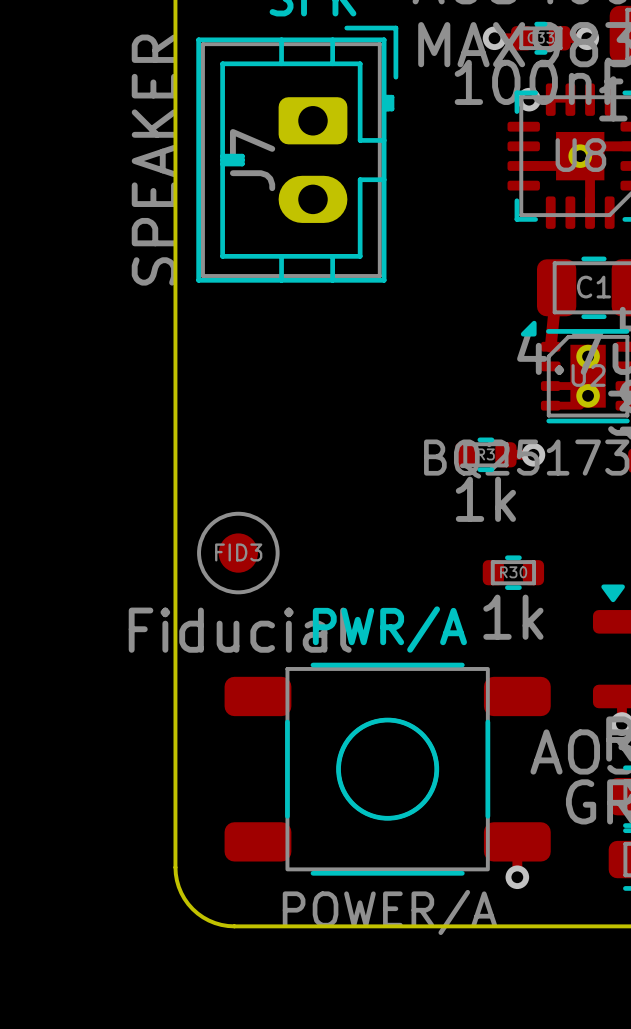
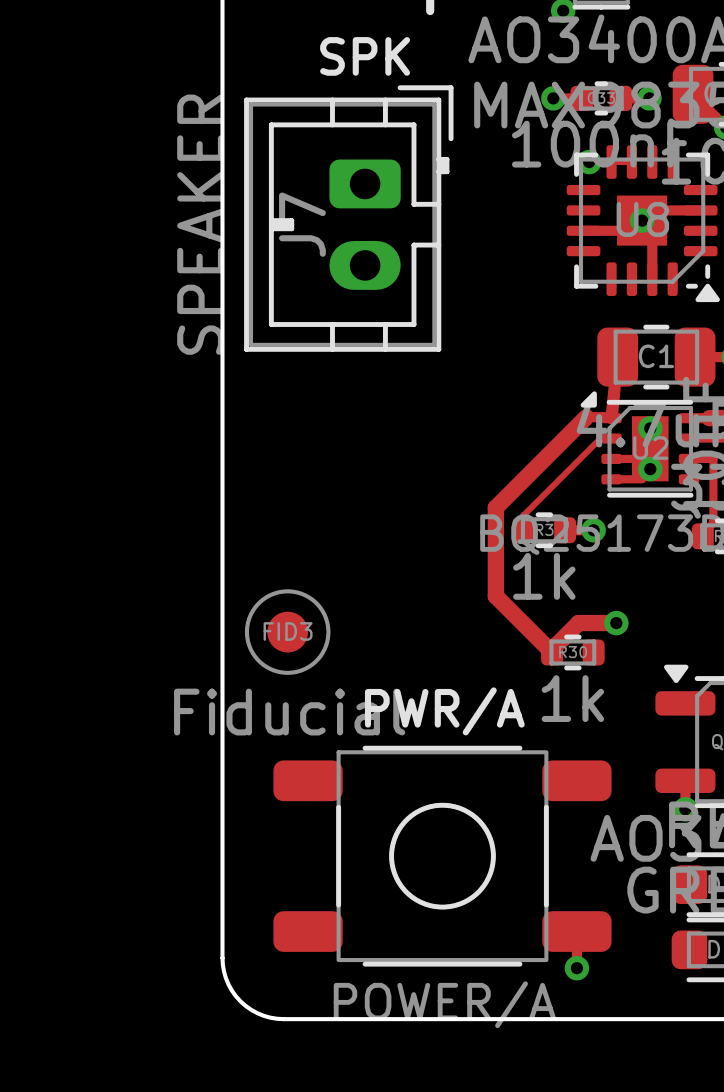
top track: none -> (611, 418) (586, 417) (495, 507) (495, 596) (552, 652) (552, 649) (578, 623) (616, 623)
top track: none -> (611, 438) (600, 438) (523, 515) (523, 530)
via: none -> (616, 623)

